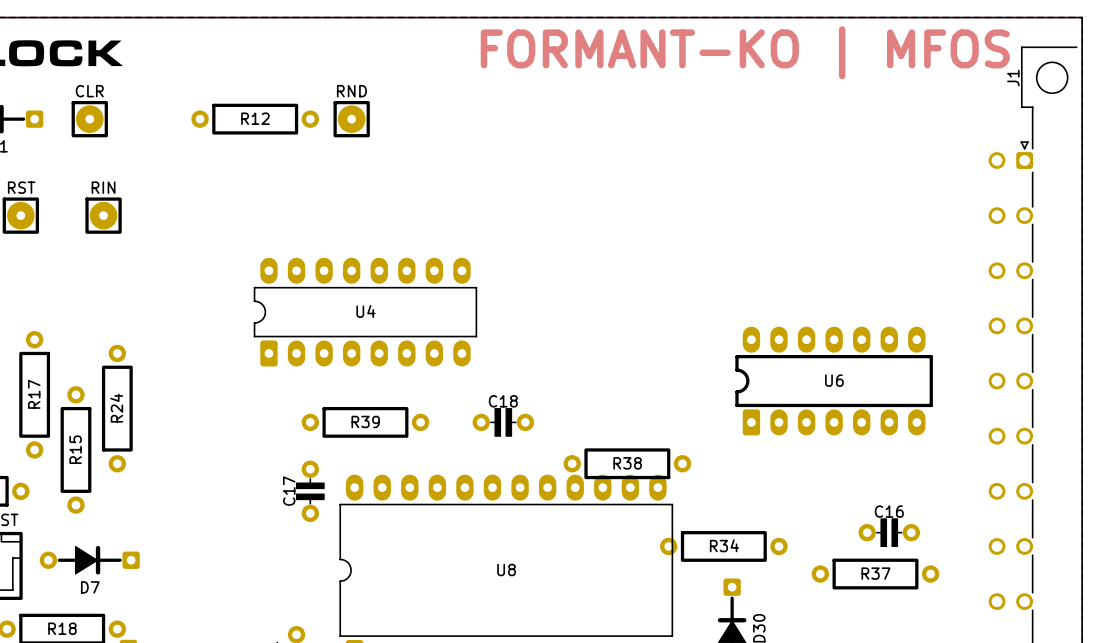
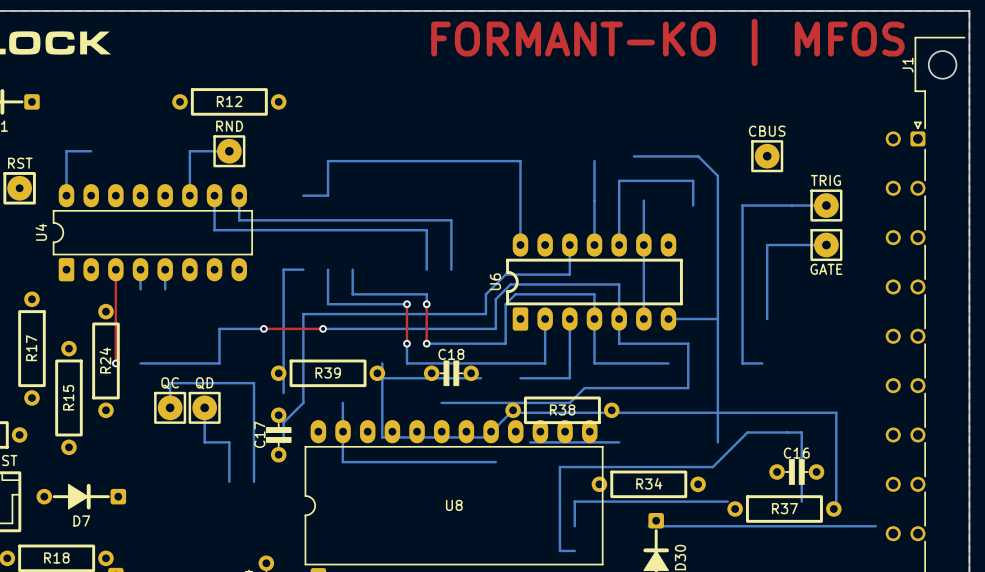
part: CLR (89, 119) -> none
part: RND (351, 119) -> none
bottom track: none -> (91, 151) (66, 151) (66, 195)
bottom track: none -> (229, 151) (189, 151) (189, 195)
part: none -> RND (229, 151)
part: none -> CBUS (767, 156)
bottom track: none -> (633, 156) (698, 156) (717, 175) (717, 442)
bottom track: none -> (594, 161) (594, 245)
part: RIN (103, 215) -> none
bottom track: none -> (214, 195) (214, 230) (426, 230) (426, 269)
bottom track: none -> (239, 195) (239, 220) (451, 220) (451, 269)
bottom track: none -> (303, 195) (328, 195) (328, 161) (520, 161) (520, 245)
bottom track: none -> (643, 200) (643, 319)
bottom track: none -> (693, 205) (693, 180) (619, 180) (619, 245)
bottom track: none -> (826, 205) (742, 205) (742, 363) (762, 363)
part: none -> TRIG (826, 205)
bottom track: none -> (569, 245) (569, 274) (505, 274) (485, 294) (485, 314) (303, 314) (303, 402) (283, 422) (283, 442)
bottom track: none -> (826, 245) (767, 245) (767, 319)
part: none -> GATE (826, 245)
top track: none -> (115, 269) (115, 363)
bottom track: none -> (140, 269) (140, 289)
bottom track: none -> (165, 269) (165, 289)
bottom track: none -> (303, 269) (283, 269) (283, 393)
bottom track: none -> (328, 269) (328, 304) (406, 304)
bottom track: none -> (352, 269) (352, 294) (426, 294) (426, 304)
U4 name rotation: 0° (365, 311) -> 90° counterclockwise (41, 232)
U4 name position: U4 (365, 311) -> U4 (41, 232)
U4 position: (365, 312) -> (152, 232)
top track: none -> (406, 304) (406, 343)
via: none -> (406, 304)
top track: none -> (426, 304) (426, 343)
via: none -> (426, 304)
bottom track: none -> (545, 319) (545, 363) (406, 363) (406, 343)
bottom track: none -> (569, 319) (569, 378) (520, 378)
bottom track: none -> (668, 319) (717, 319)
bottom track: none -> (263, 328) (219, 328) (219, 363) (140, 363)
top track: none -> (263, 328) (323, 328)
via: none -> (263, 328)
bottom track: none -> (323, 328) (495, 328) (495, 299) (510, 284) (619, 284) (619, 343) (688, 343) (688, 388) (584, 388) (569, 402) (441, 402)
via: none -> (323, 328)
U6 name rotation: 0° (834, 380) -> 90° counterclockwise (495, 281)
U6 name position: U6 (834, 380) -> U6 (495, 281)
U6 position: (834, 381) -> (594, 282)
via: none -> (406, 343)
bottom track: none -> (426, 343) (505, 343) (505, 304) (515, 294) (594, 294) (594, 363) (668, 363)
via: none -> (426, 343)
via: none -> (115, 363)
bottom track: none -> (382, 363) (382, 437) (485, 437) (510, 412) (836, 412) (836, 501)
bottom track: none -> (382, 378) (481, 378)
bottom track: none -> (342, 402) (342, 462) (495, 462)
bottom track: none -> (170, 407) (170, 383) (254, 383) (254, 481)
part: none -> QC (170, 407)
bottom track: none -> (204, 407) (204, 442) (229, 442) (229, 481)
part: none -> QD (204, 407)
bottom track: none -> (530, 442) (619, 442)
bottom track: none -> (559, 467) (559, 550)
bottom track: none -> (559, 467) (712, 467) (747, 432) (801, 432) (801, 501)
bottom track: none -> (727, 501) (574, 501) (574, 526)
bottom track: none -> (648, 526) (875, 526)
bottom track: none -> (559, 550) (574, 550)

